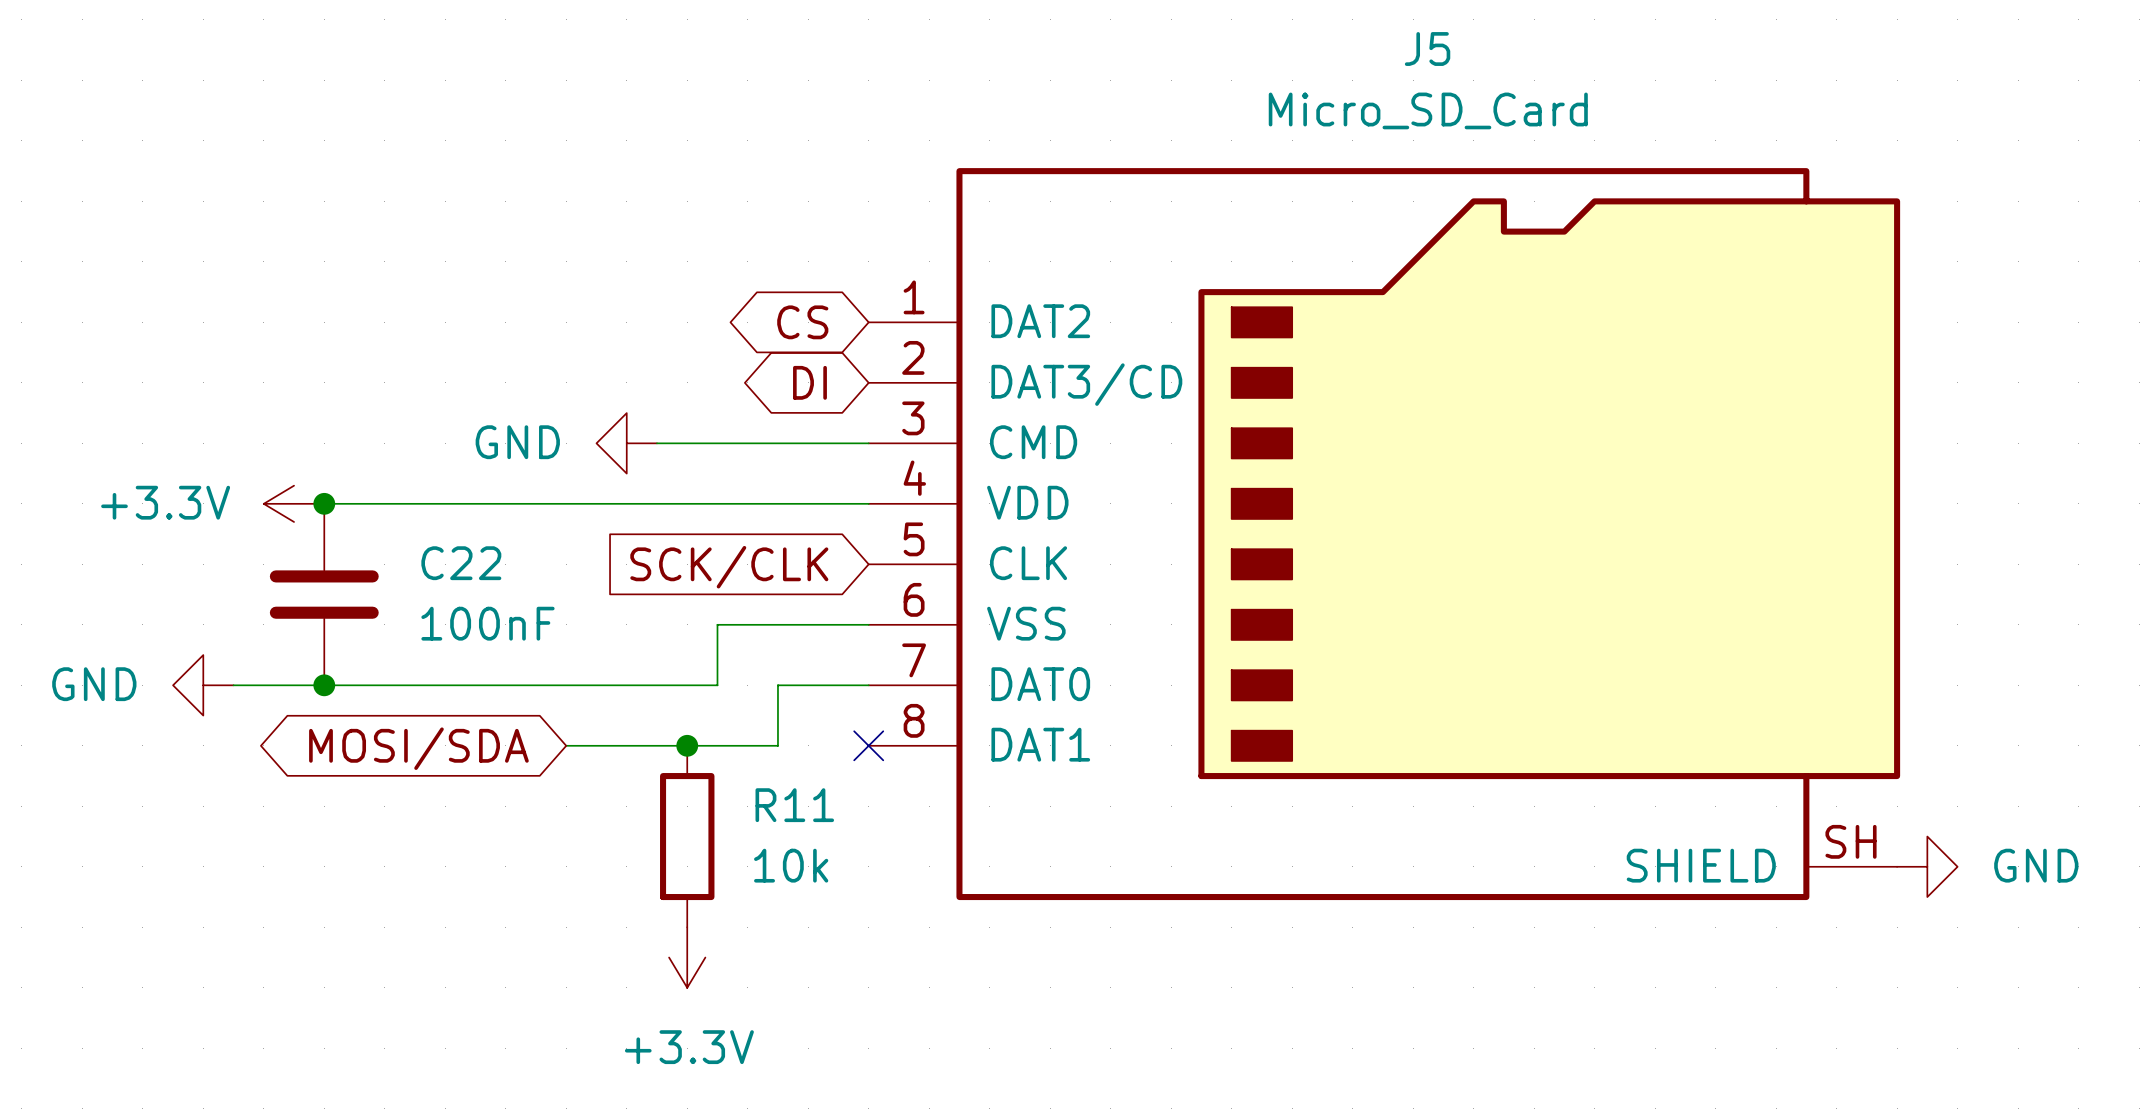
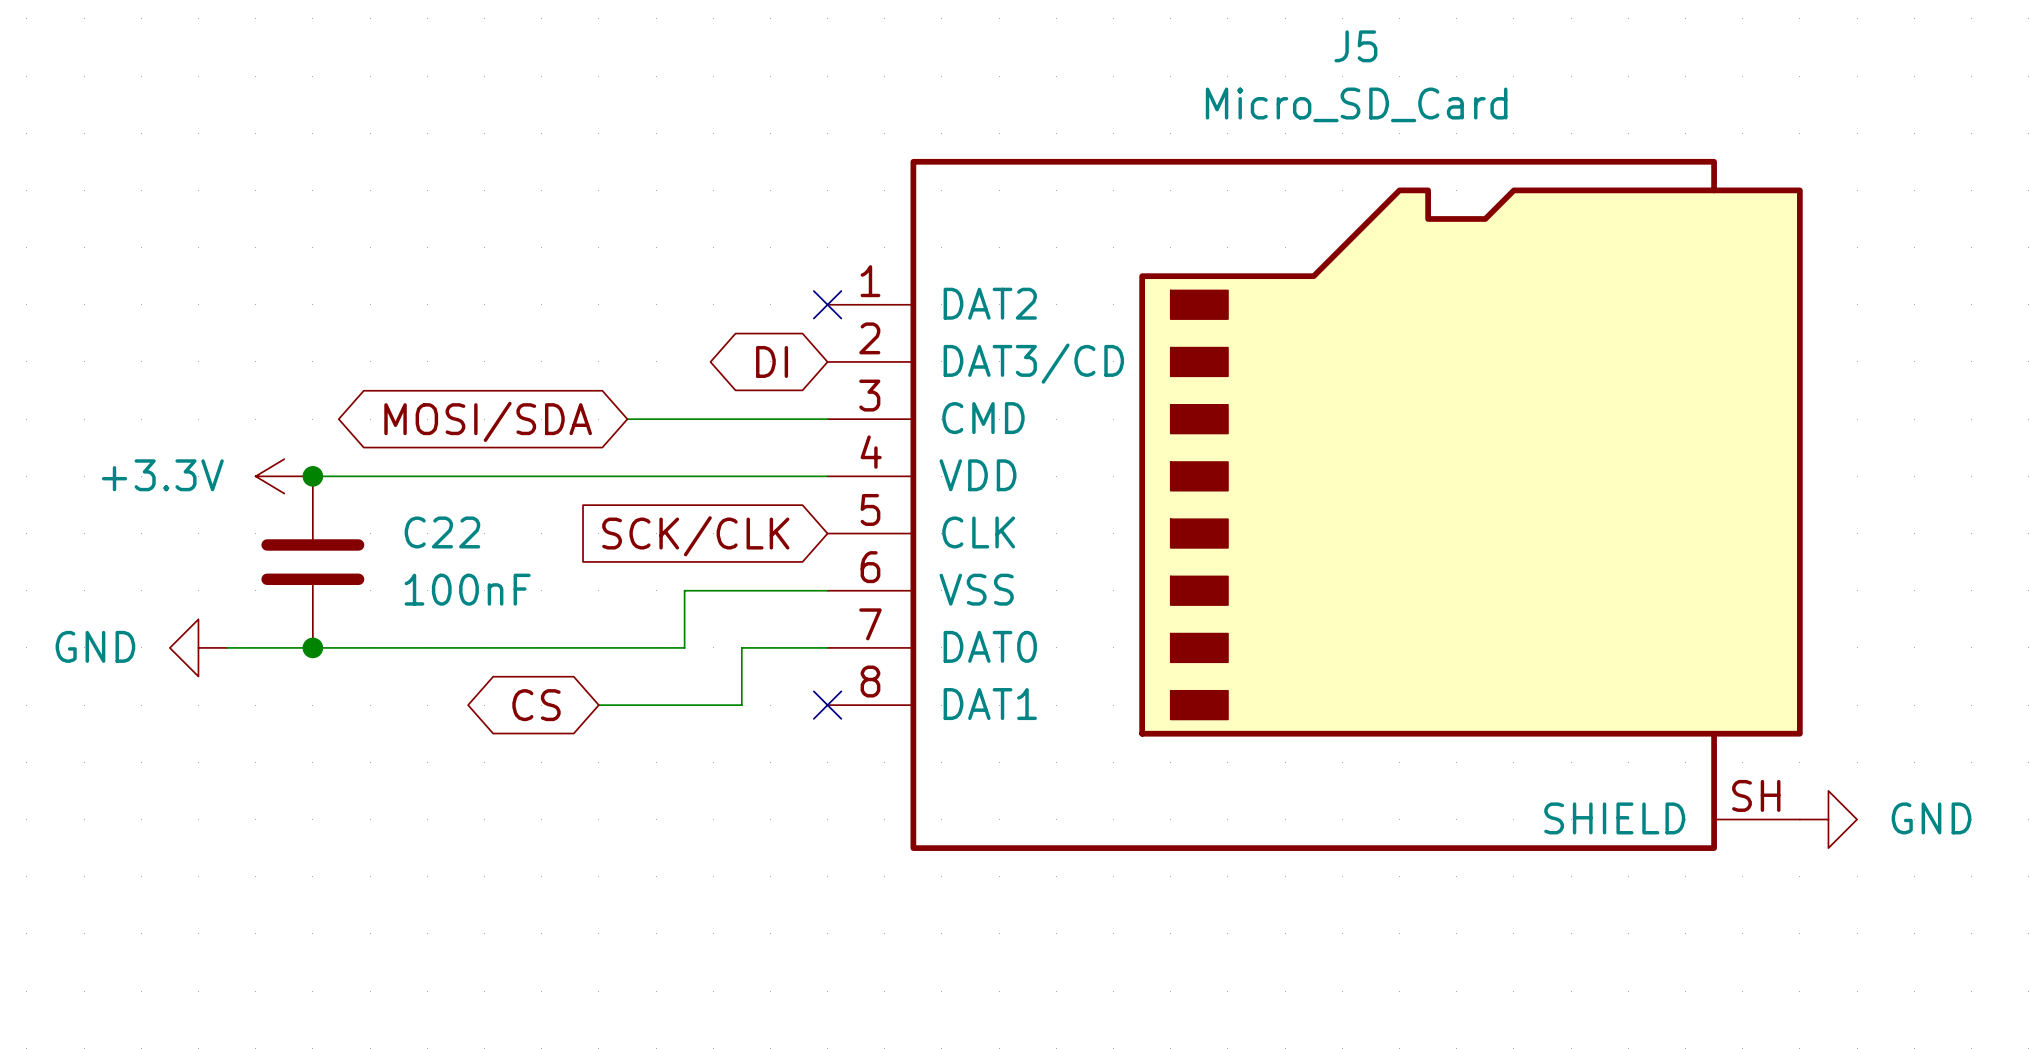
global label position: CS (802, 322) -> CS (536, 705)
no-connect mark: none -> (827, 304)
power symbol: GND (626, 443) -> none
wire: (566, 745) (626, 745) -> none
junction: (687, 745) -> none
global label position: MOSI/SDA (418, 748) -> MOSI/SDA (488, 421)
R11: 10k (687, 836) -> none
power symbol: +3.3V (687, 957) -> none

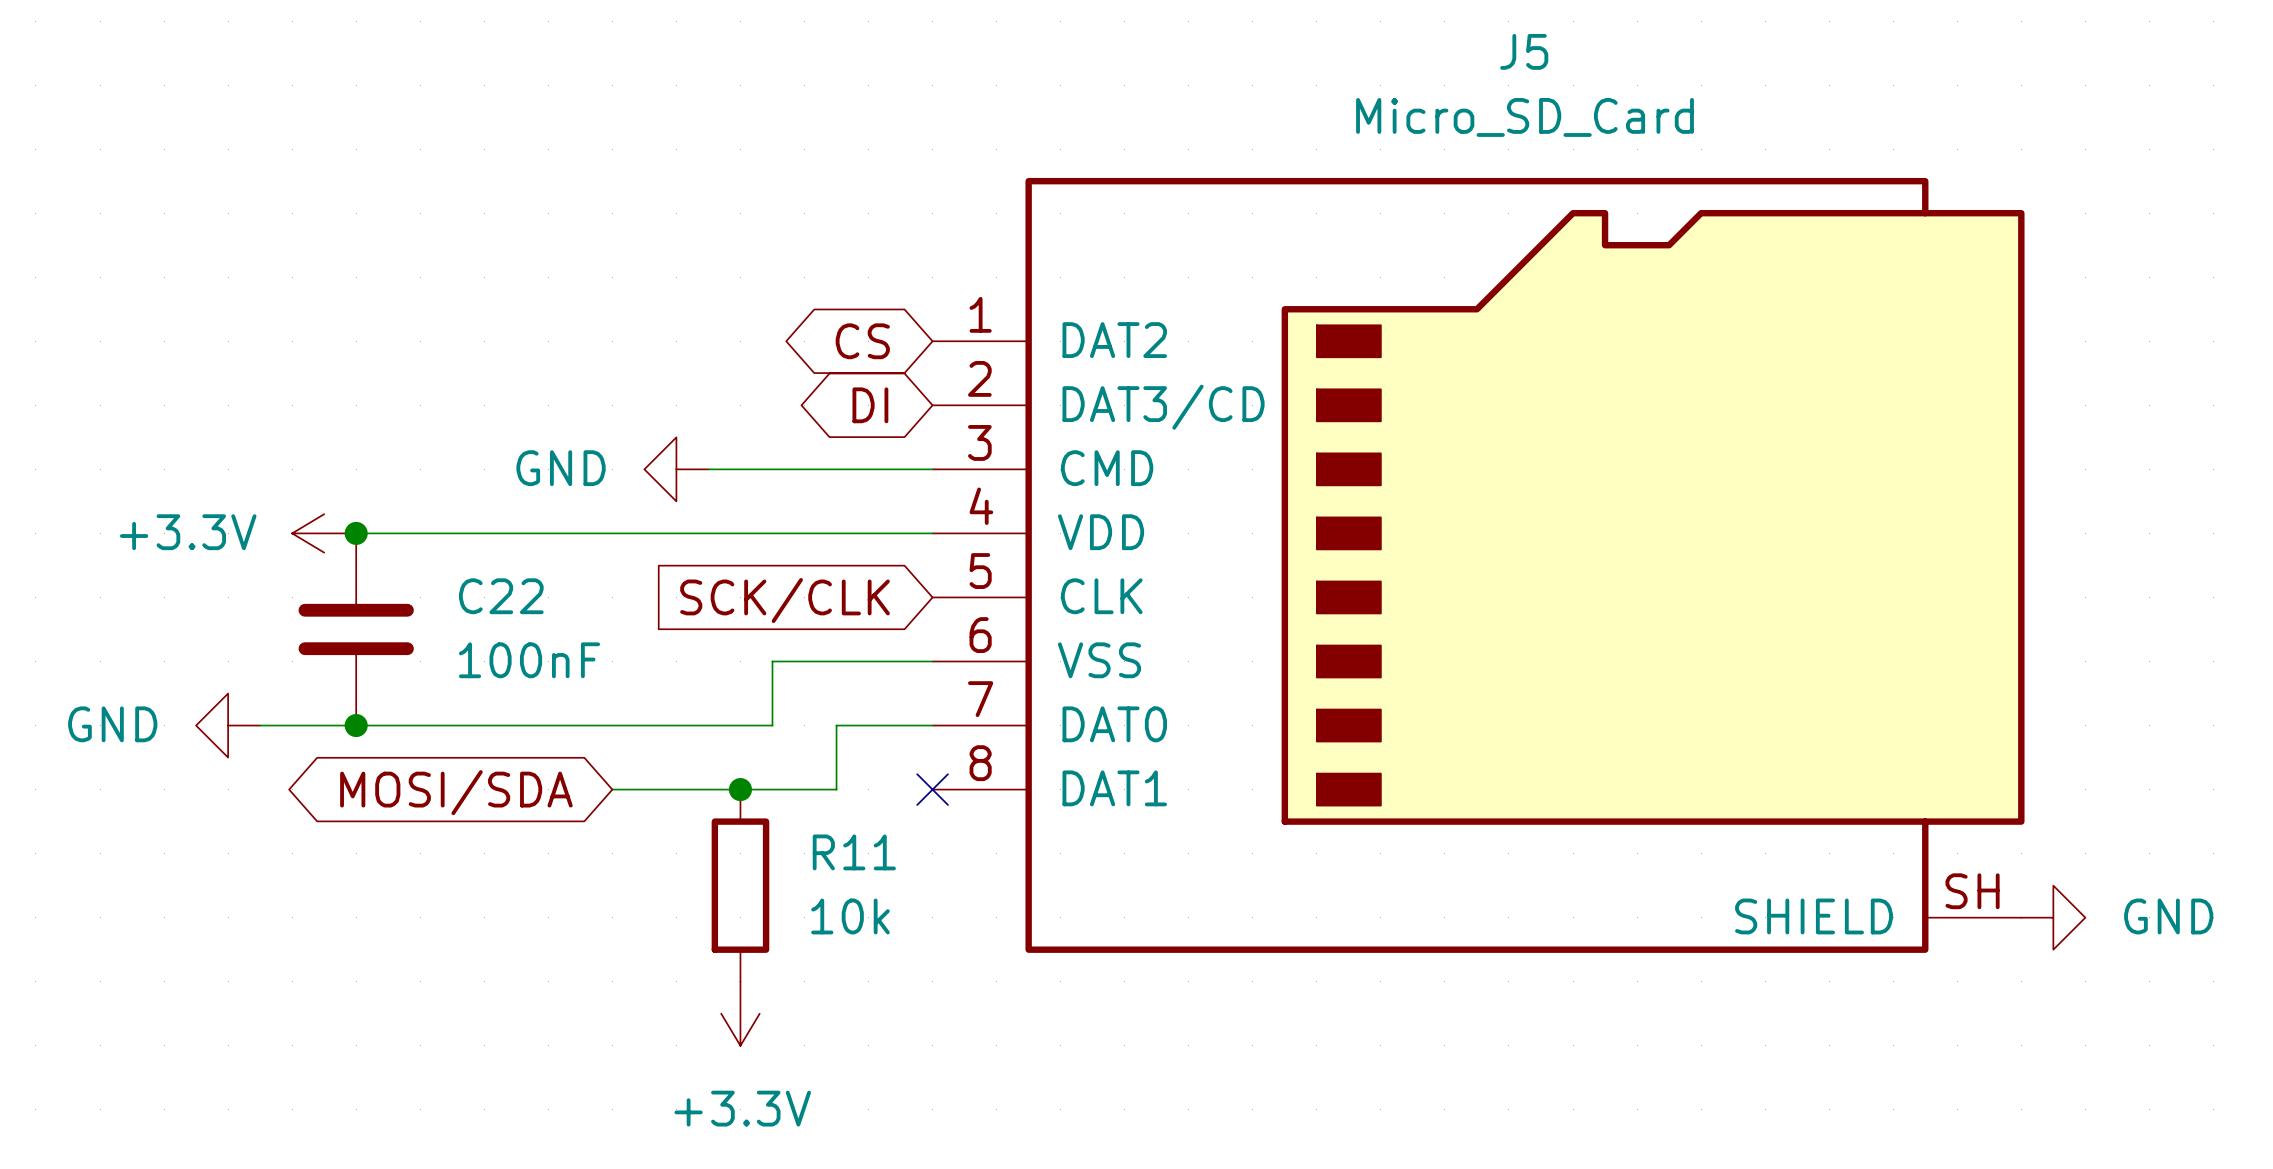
no-connect mark: (827, 304) -> none
power symbol: none -> GND (676, 469)
global label position: MOSI/SDA (488, 421) -> MOSI/SDA (456, 792)
global label position: CS (536, 705) -> CS (862, 341)
wire: none -> (612, 789) (676, 789)
junction: none -> (740, 789)
R11: none -> 10k (740, 885)
power symbol: none -> +3.3V (740, 1013)

